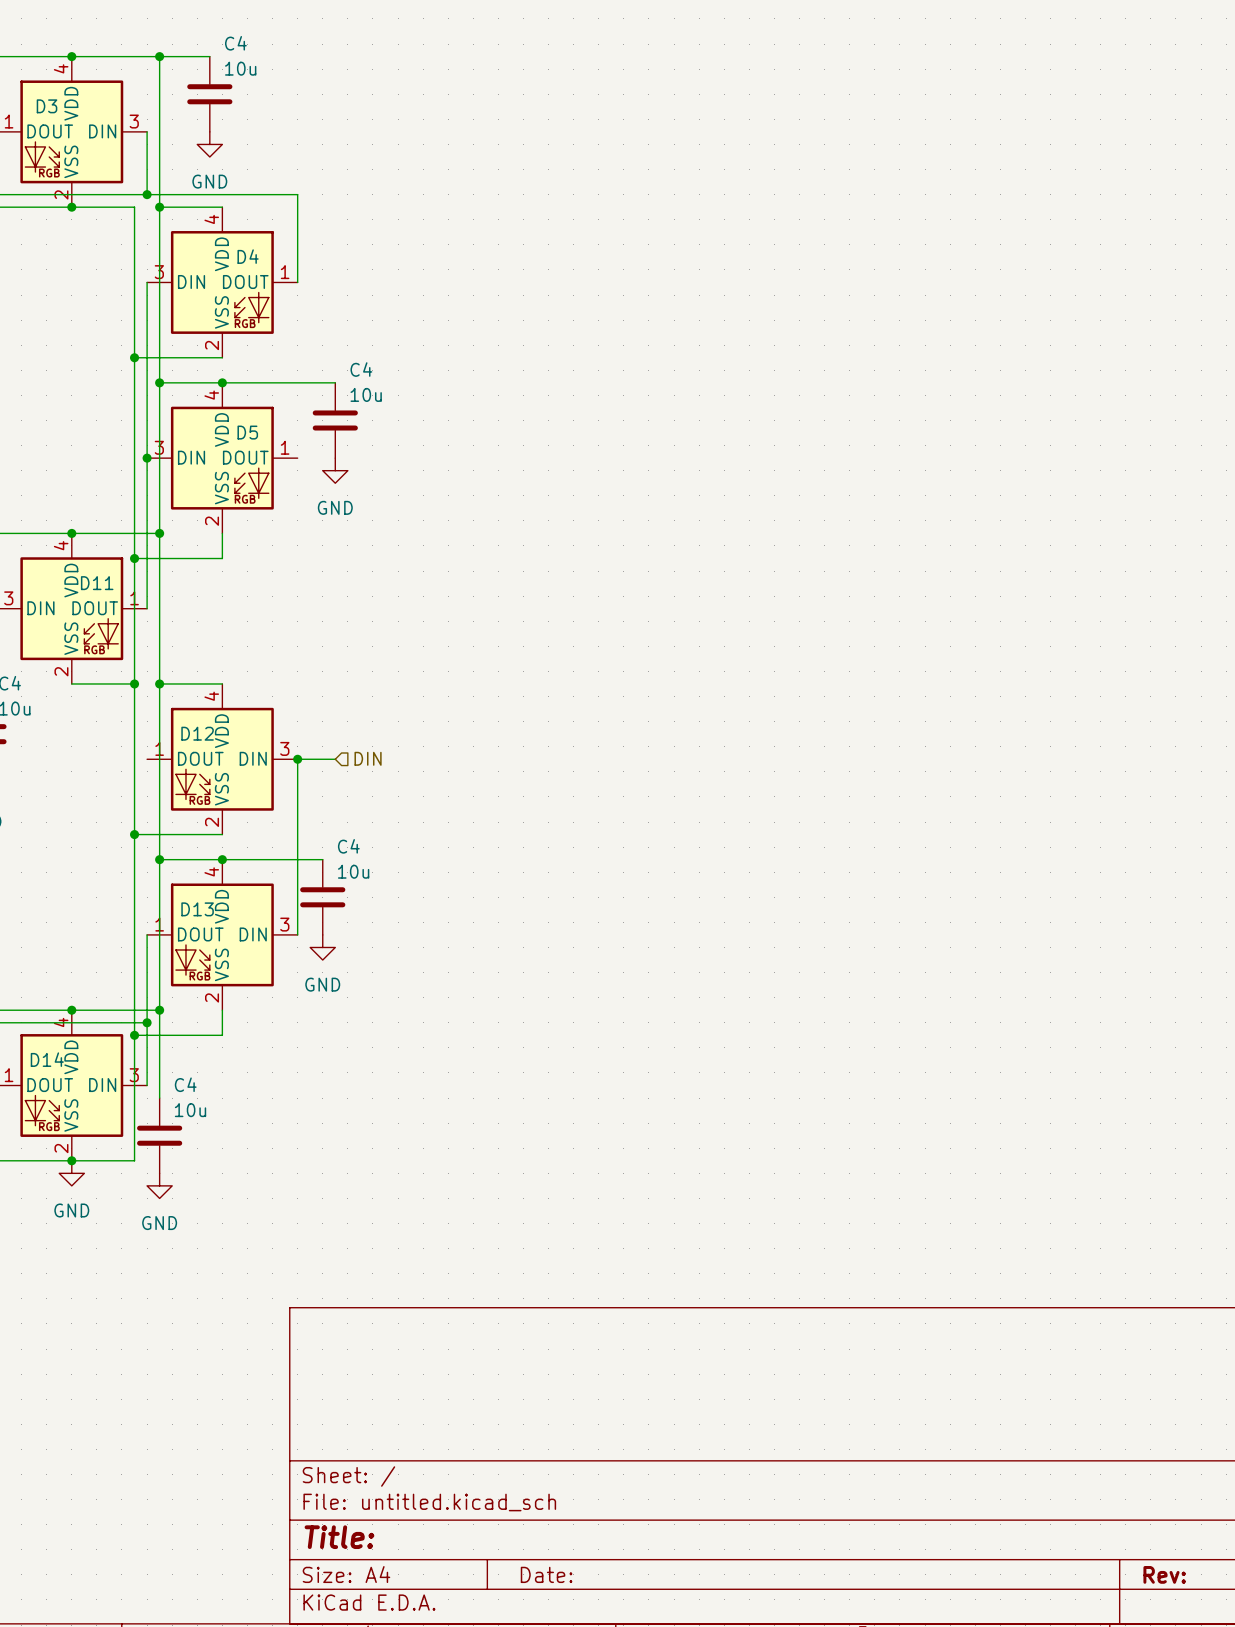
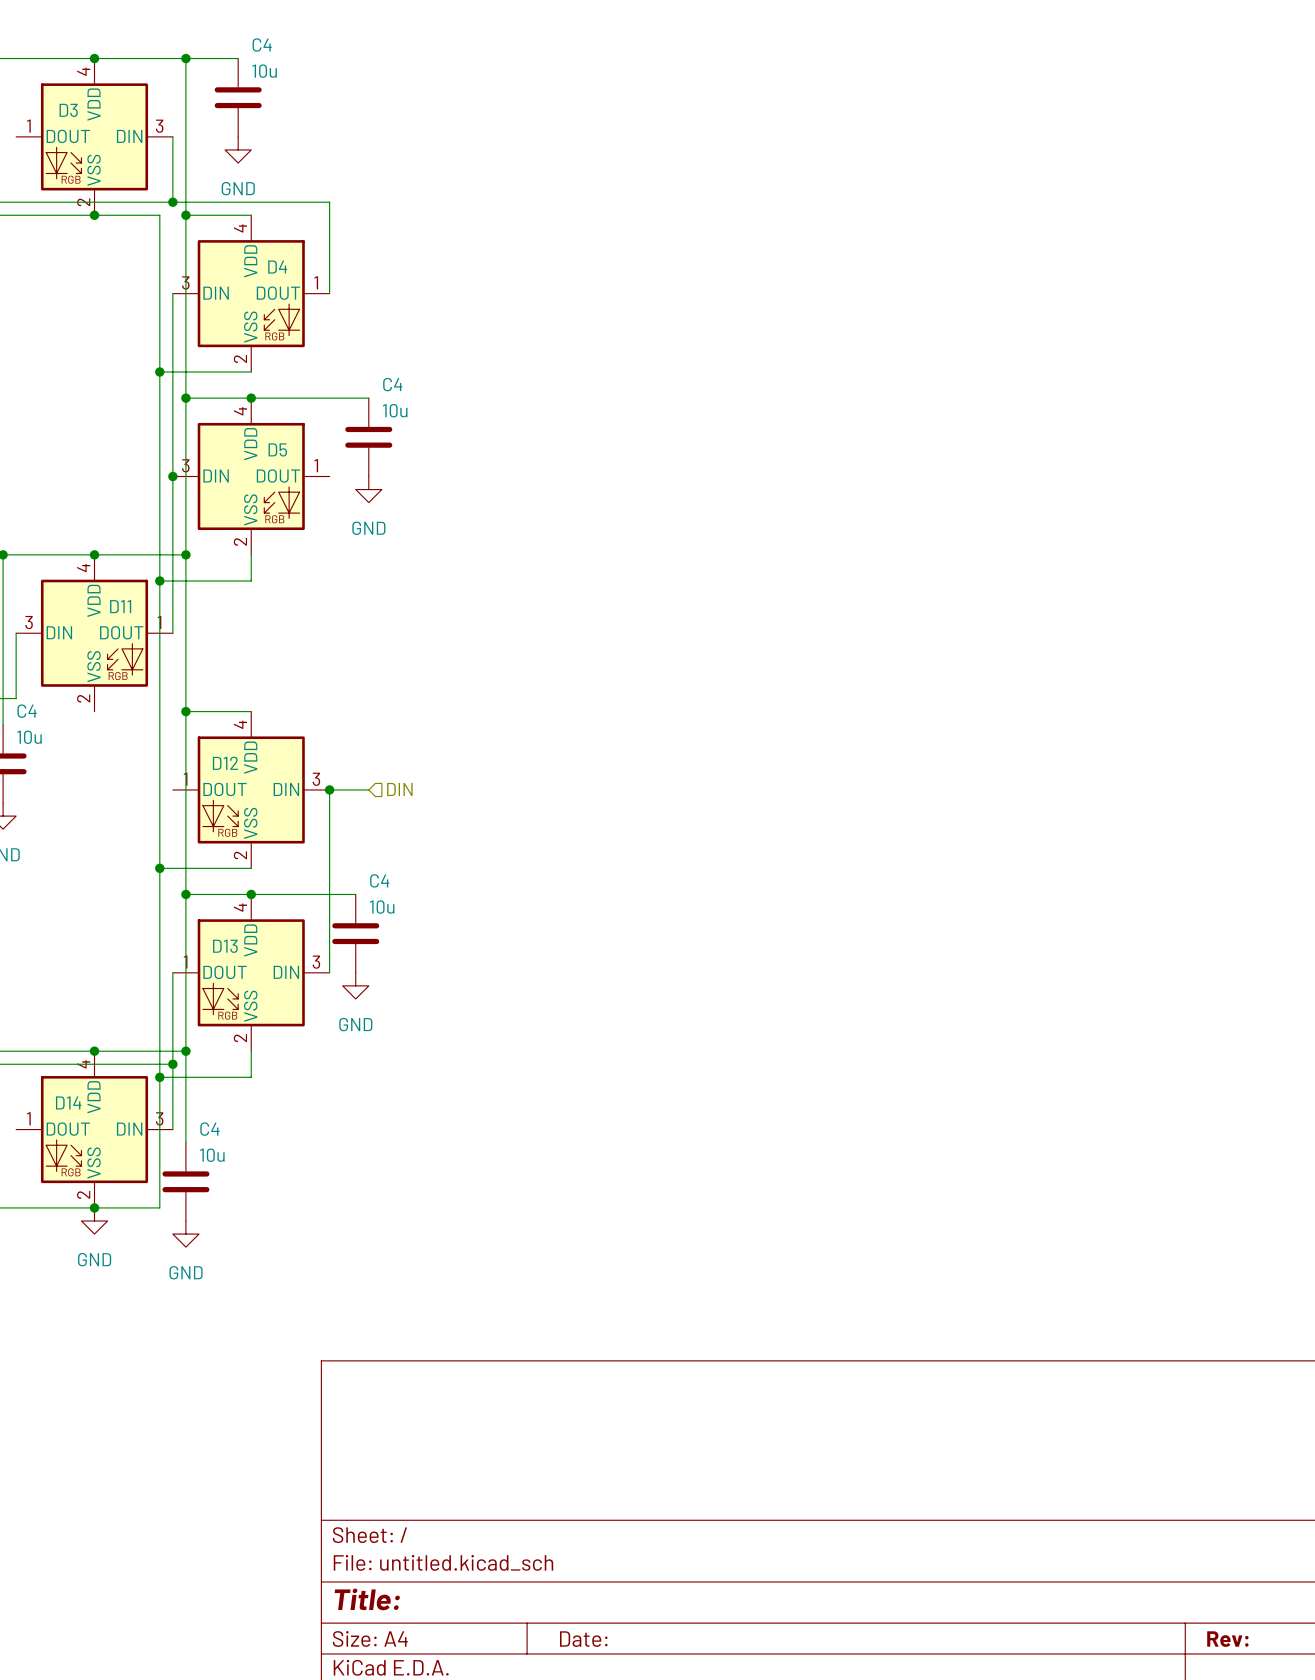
wire: (71, 683) (134, 683) -> none
junction: (134, 683) -> none

